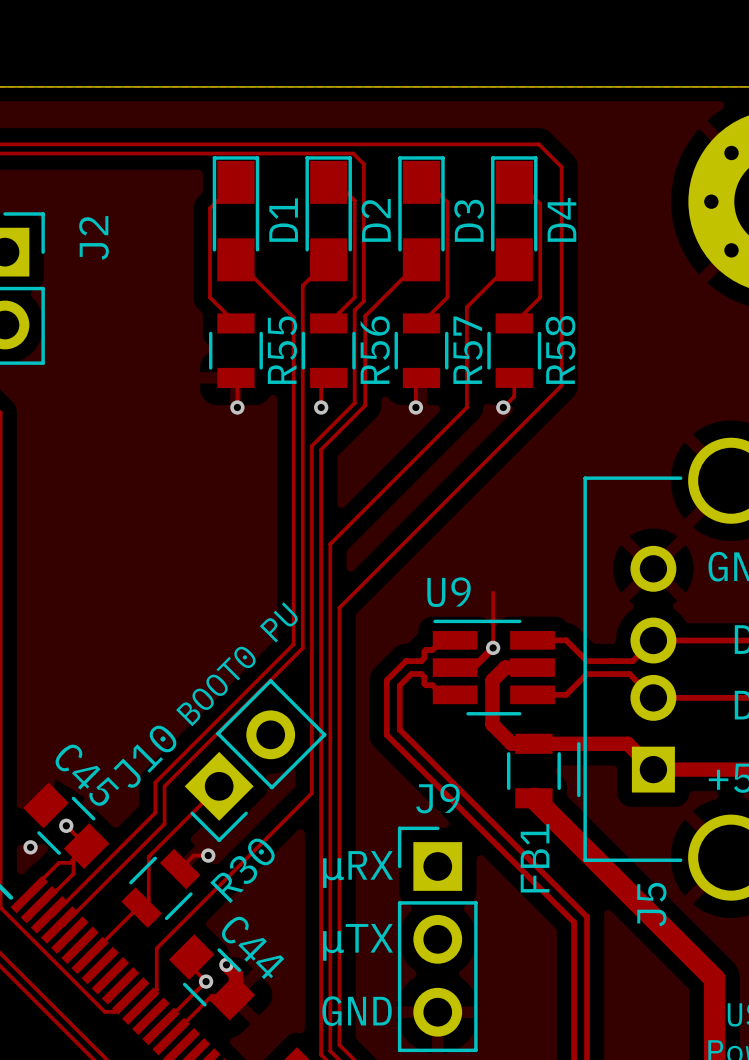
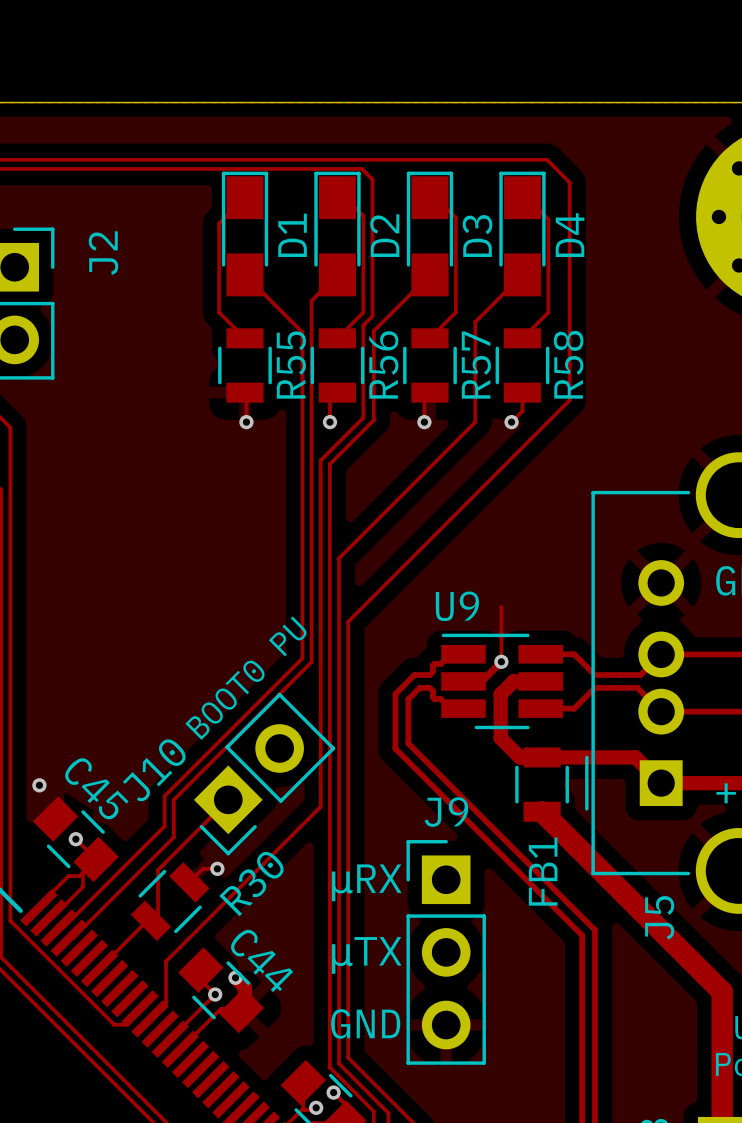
via position: (30, 847) -> (39, 785)

